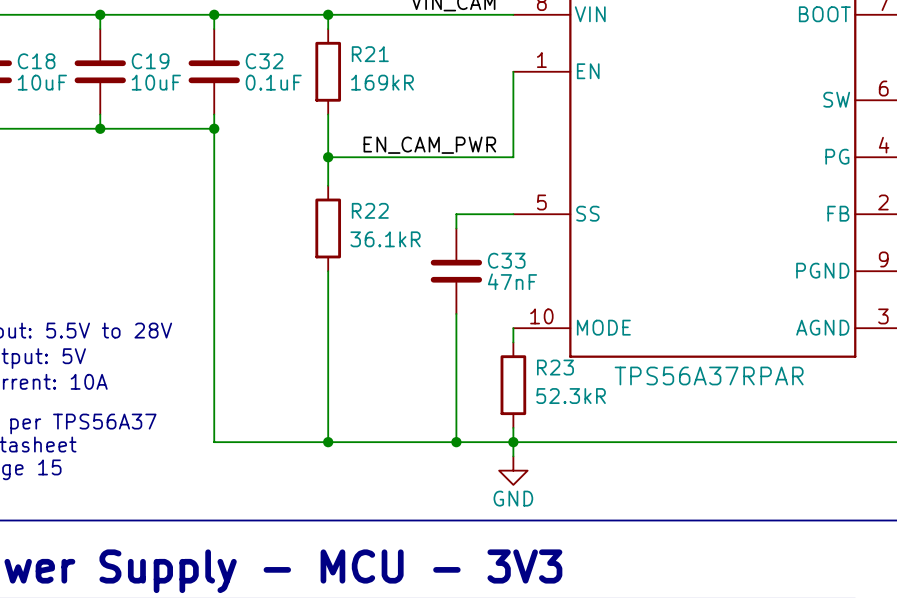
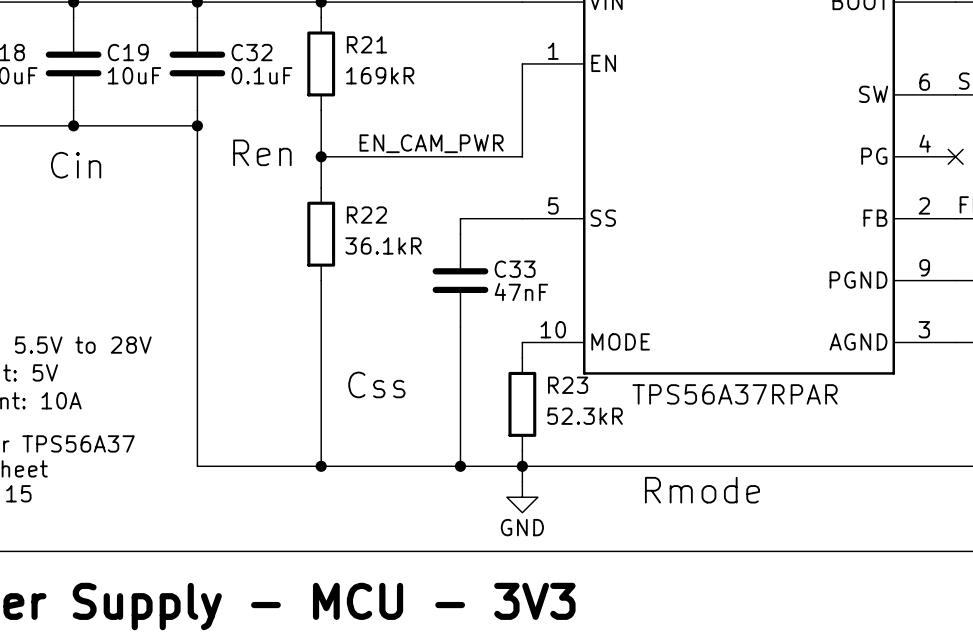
text: none -> Ren (262, 152)
text: none -> Cin (76, 165)
text: none -> Css (376, 384)
text: none -> Rmode (702, 490)

